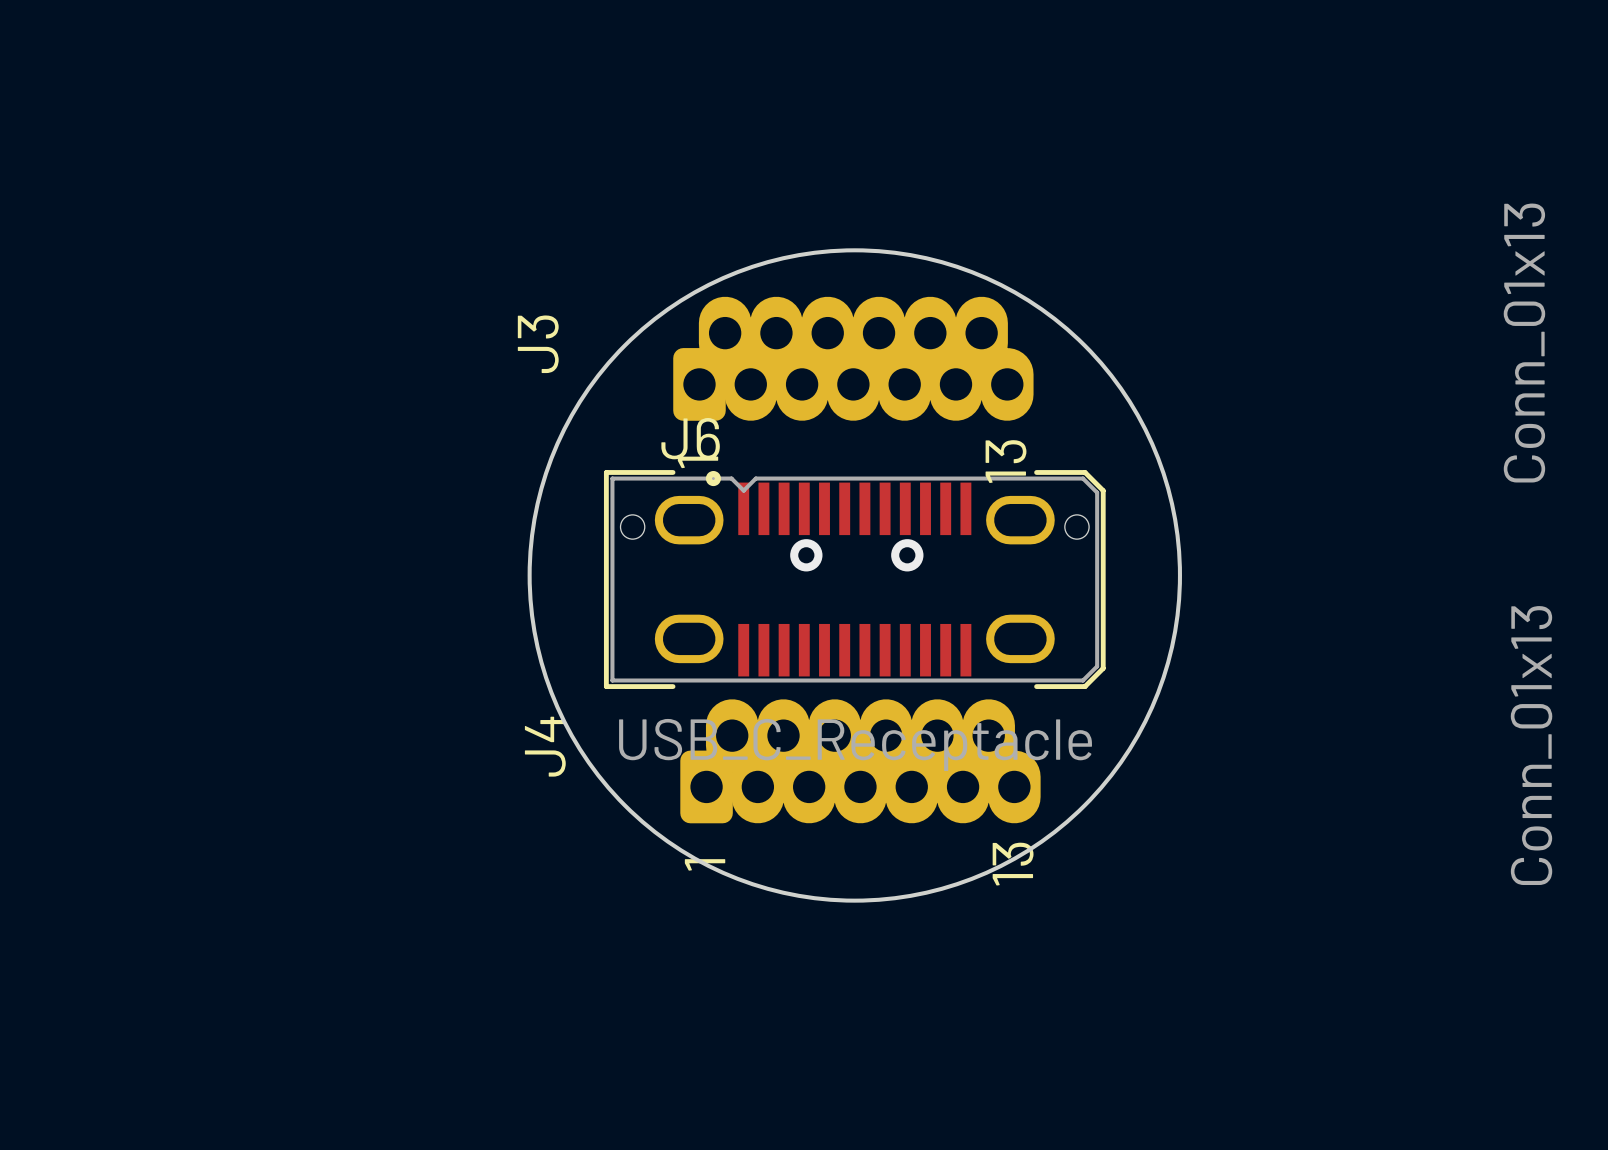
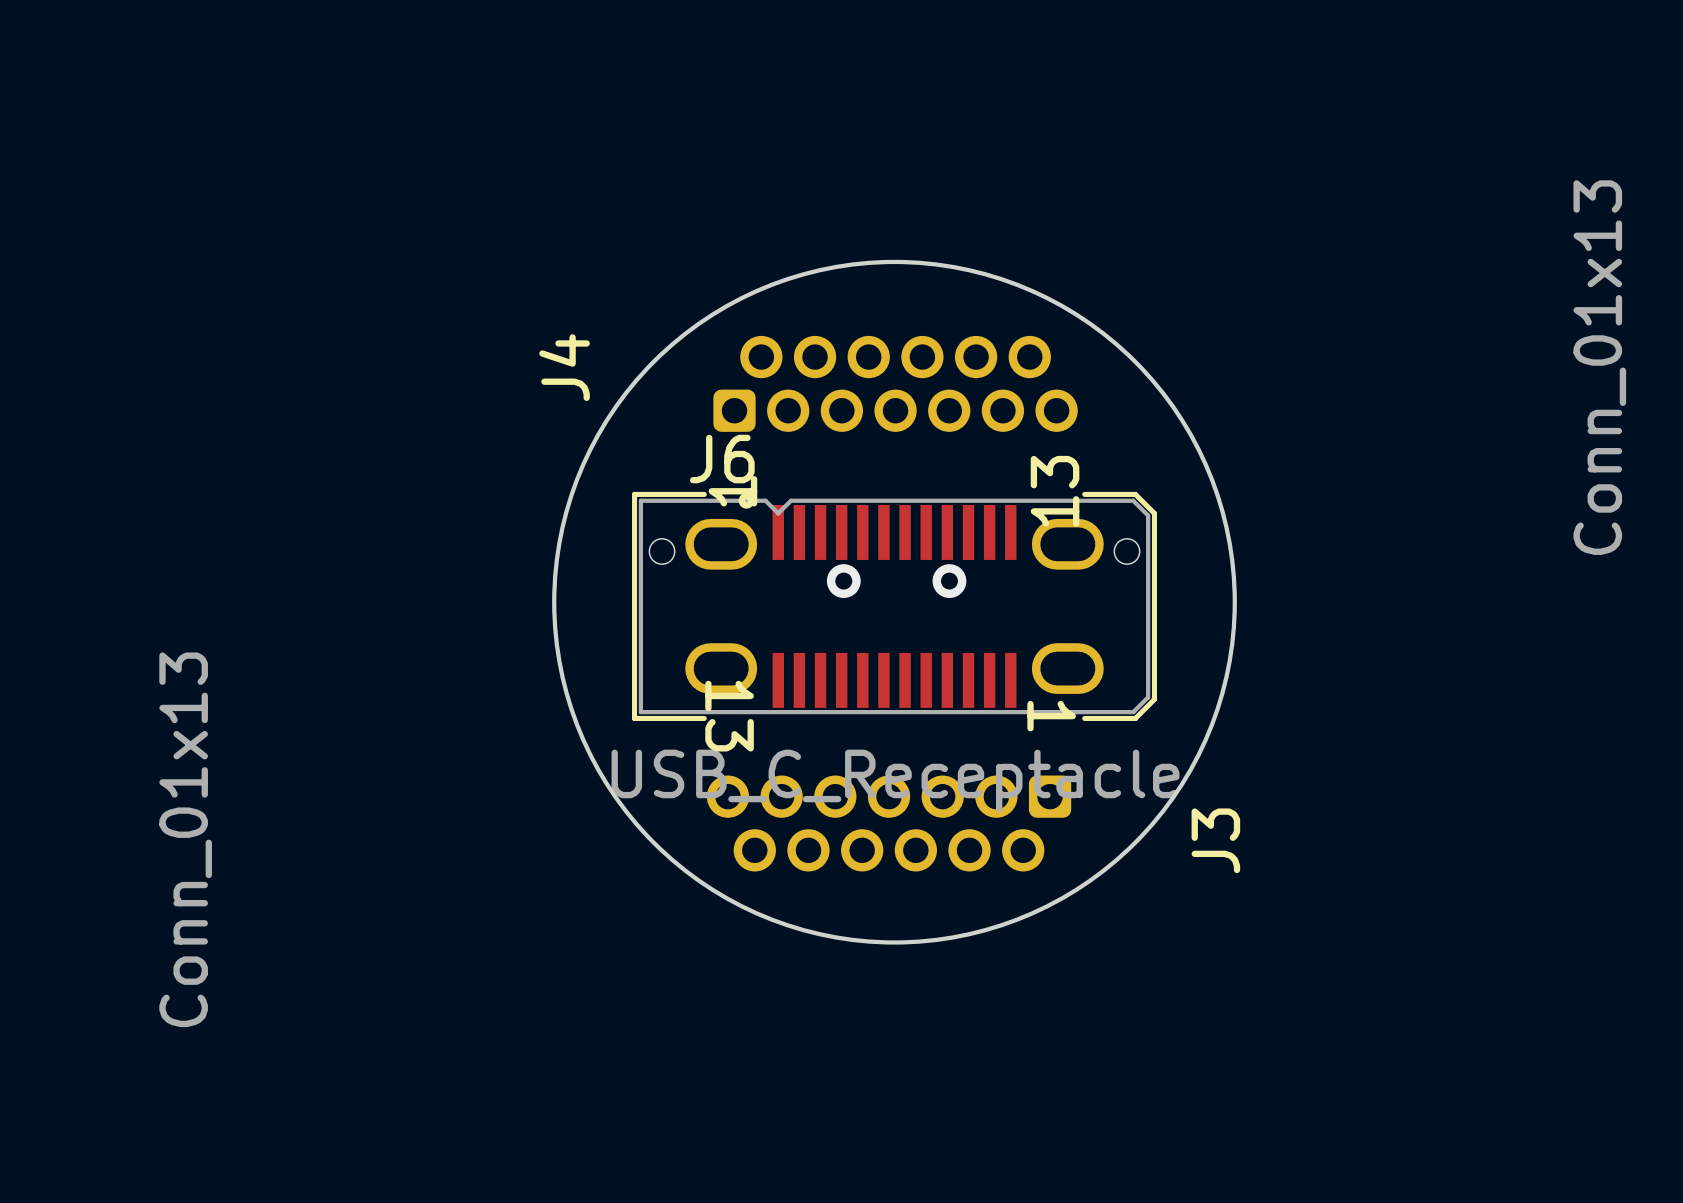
J3 footprint: [673, 296, 1034, 421] -> [706, 775, 1072, 872]
J3 value position: Conn_01x13 (1524, 343) -> Conn_01x13 (185, 839)
J3 name position: J3 (538, 344) -> J3 (1215, 840)
J4 footprint: [680, 699, 1041, 824] -> [713, 335, 1078, 432]

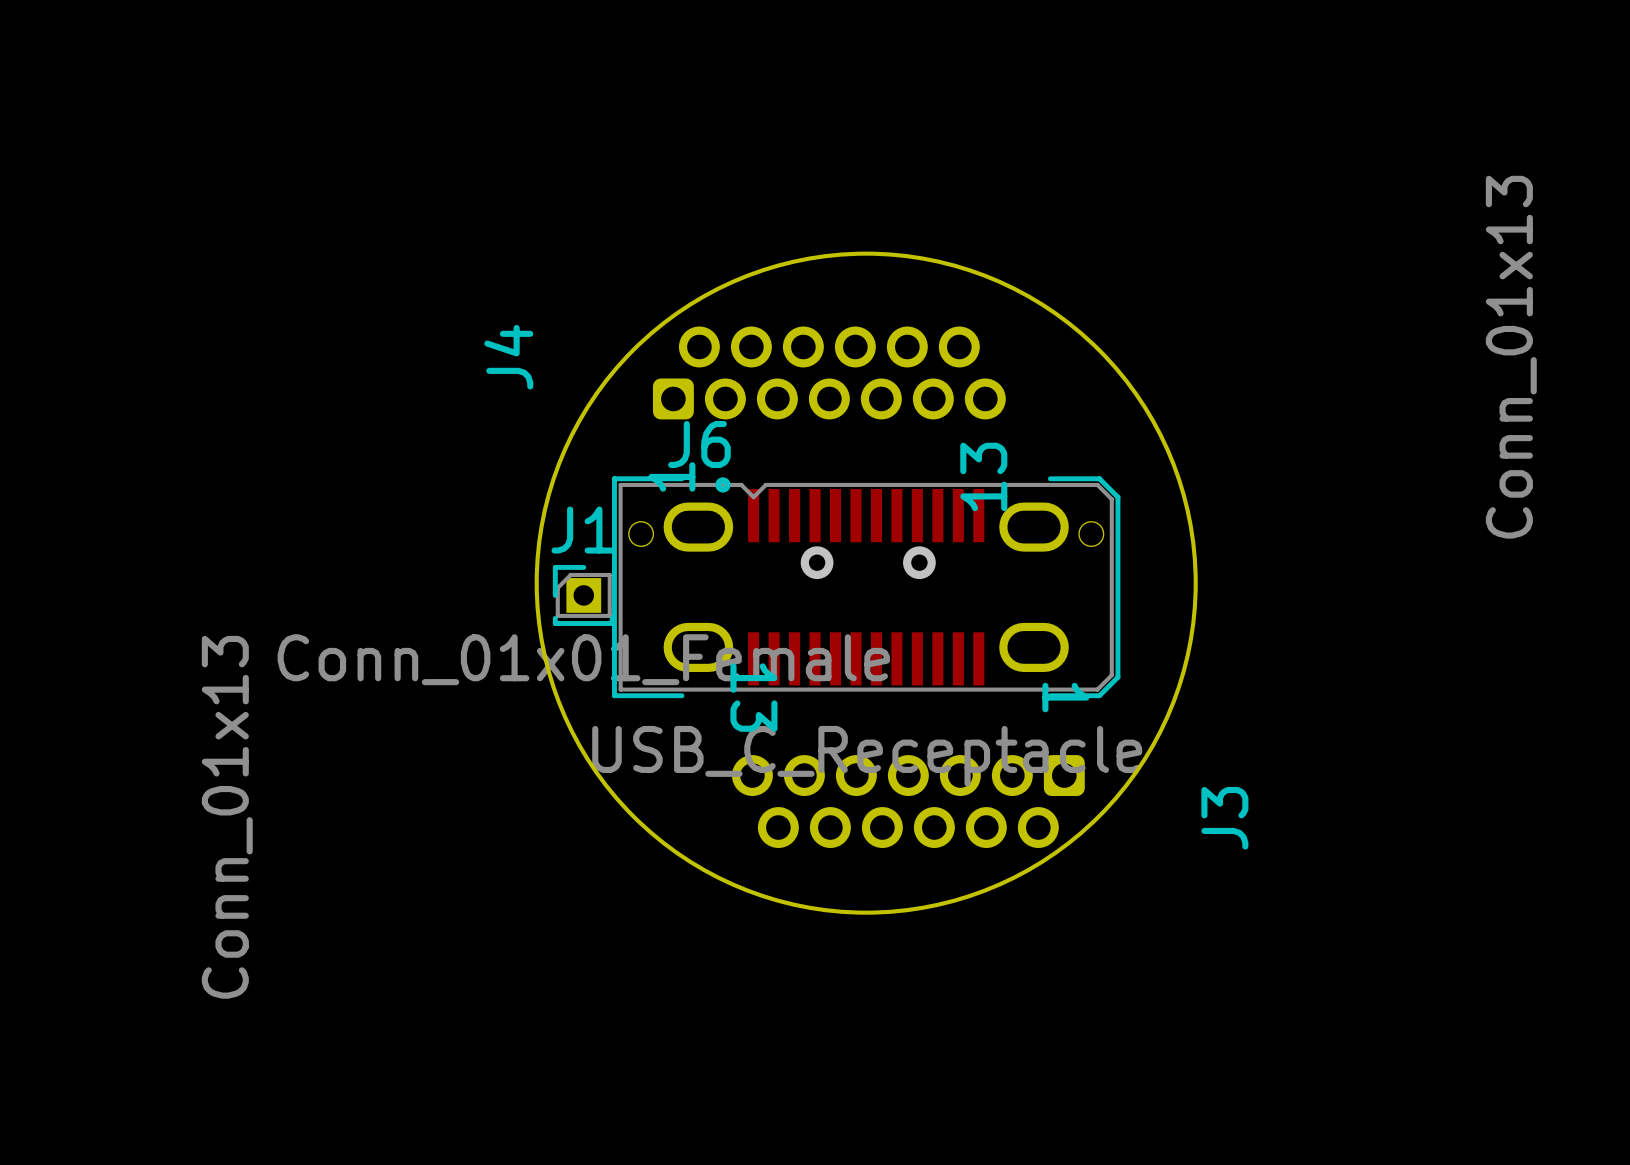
J4 position: (895, 383) -> (829, 372)
J1: none -> Conn_01x01_Female (583, 595)
J3 position: (889, 823) -> (908, 801)

